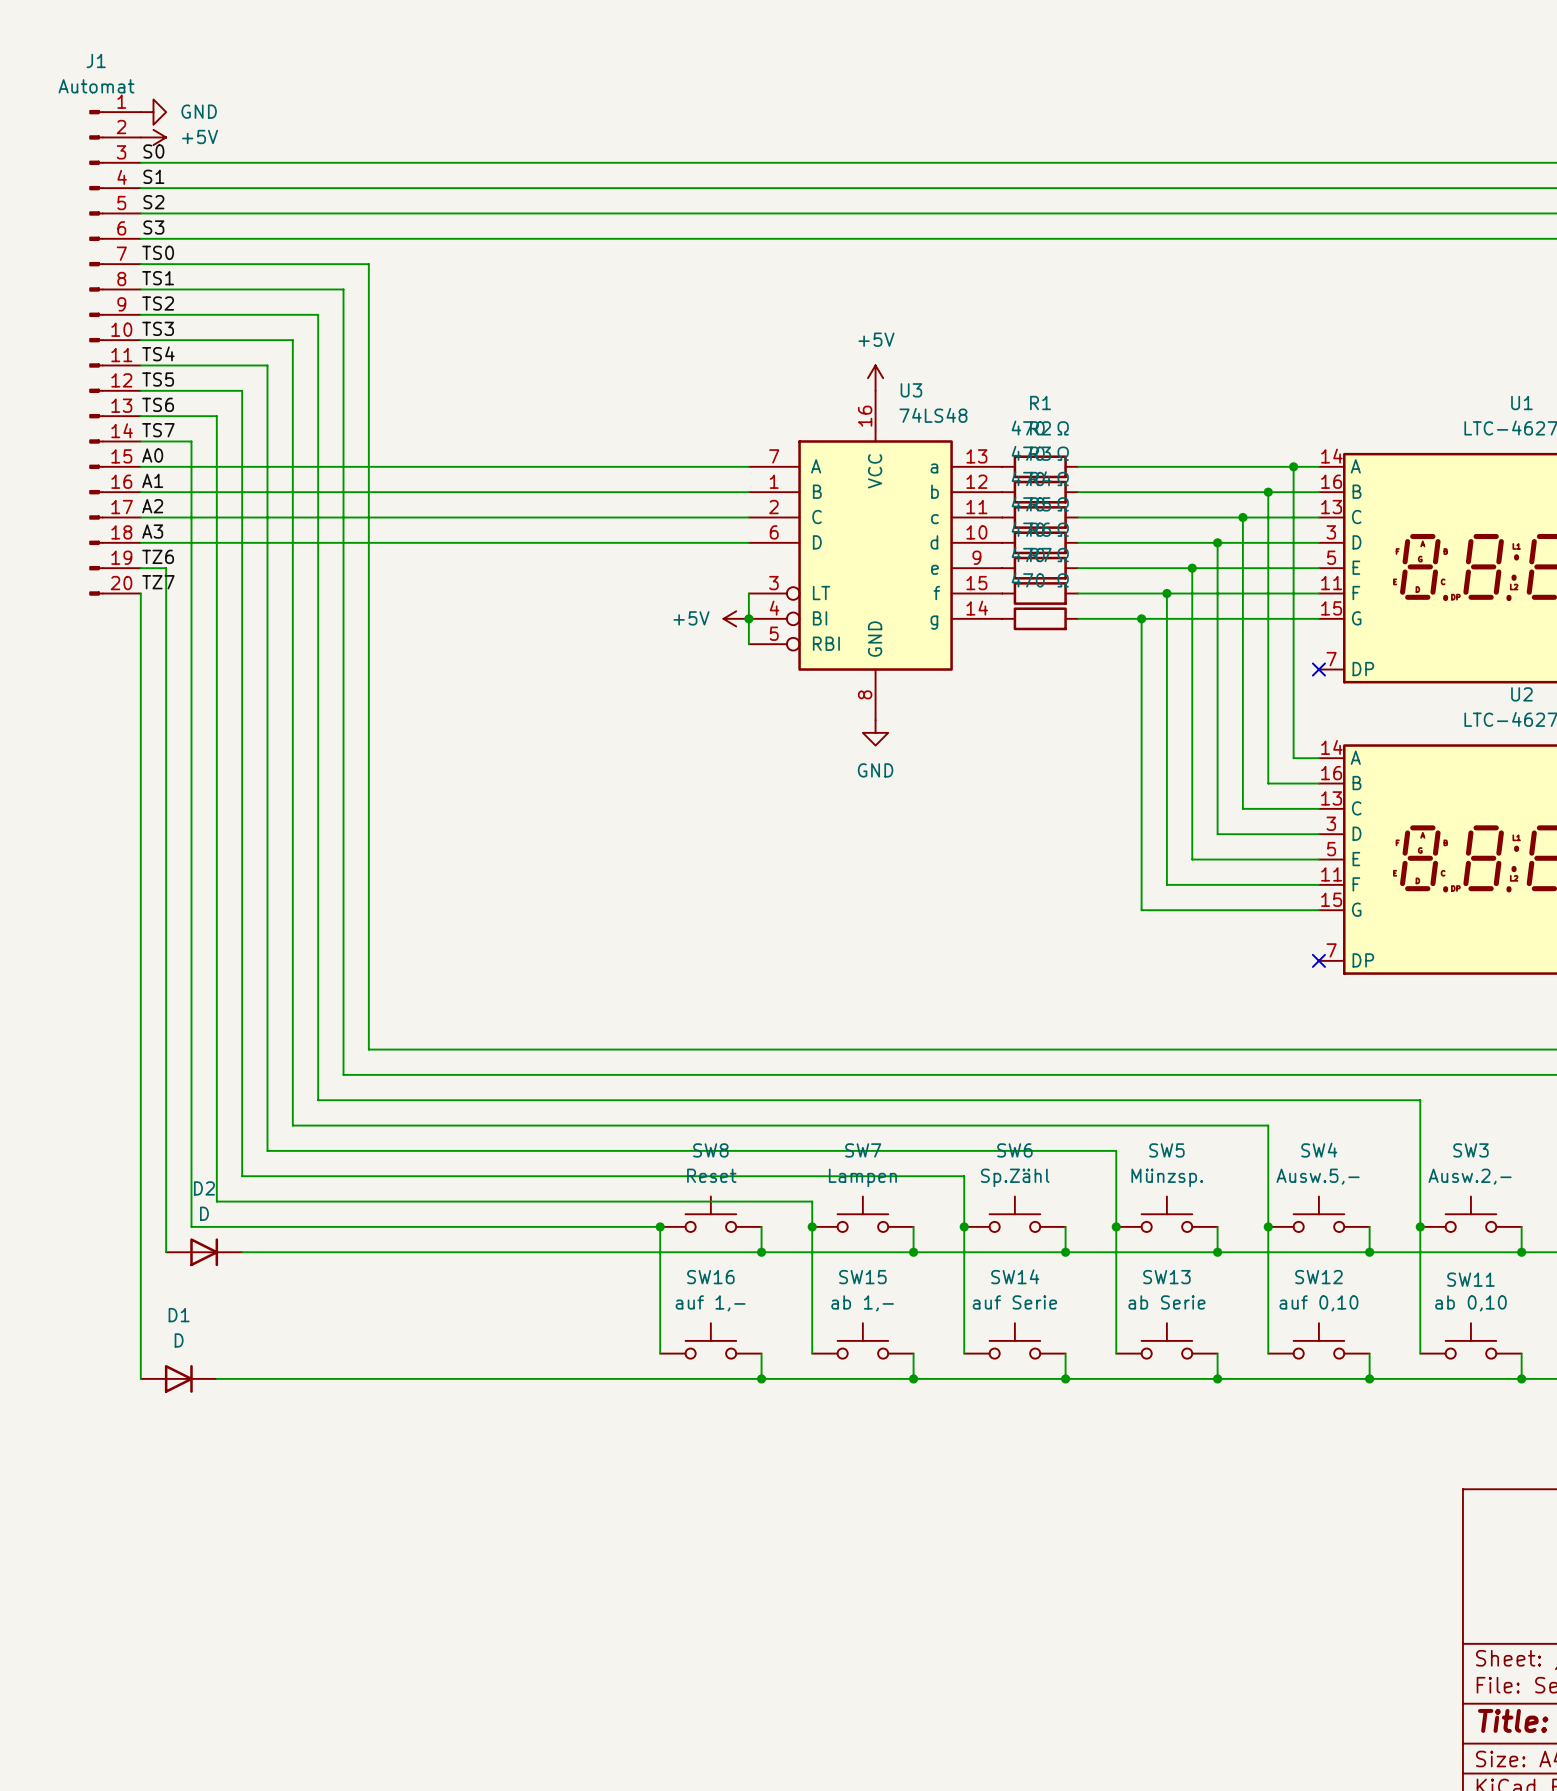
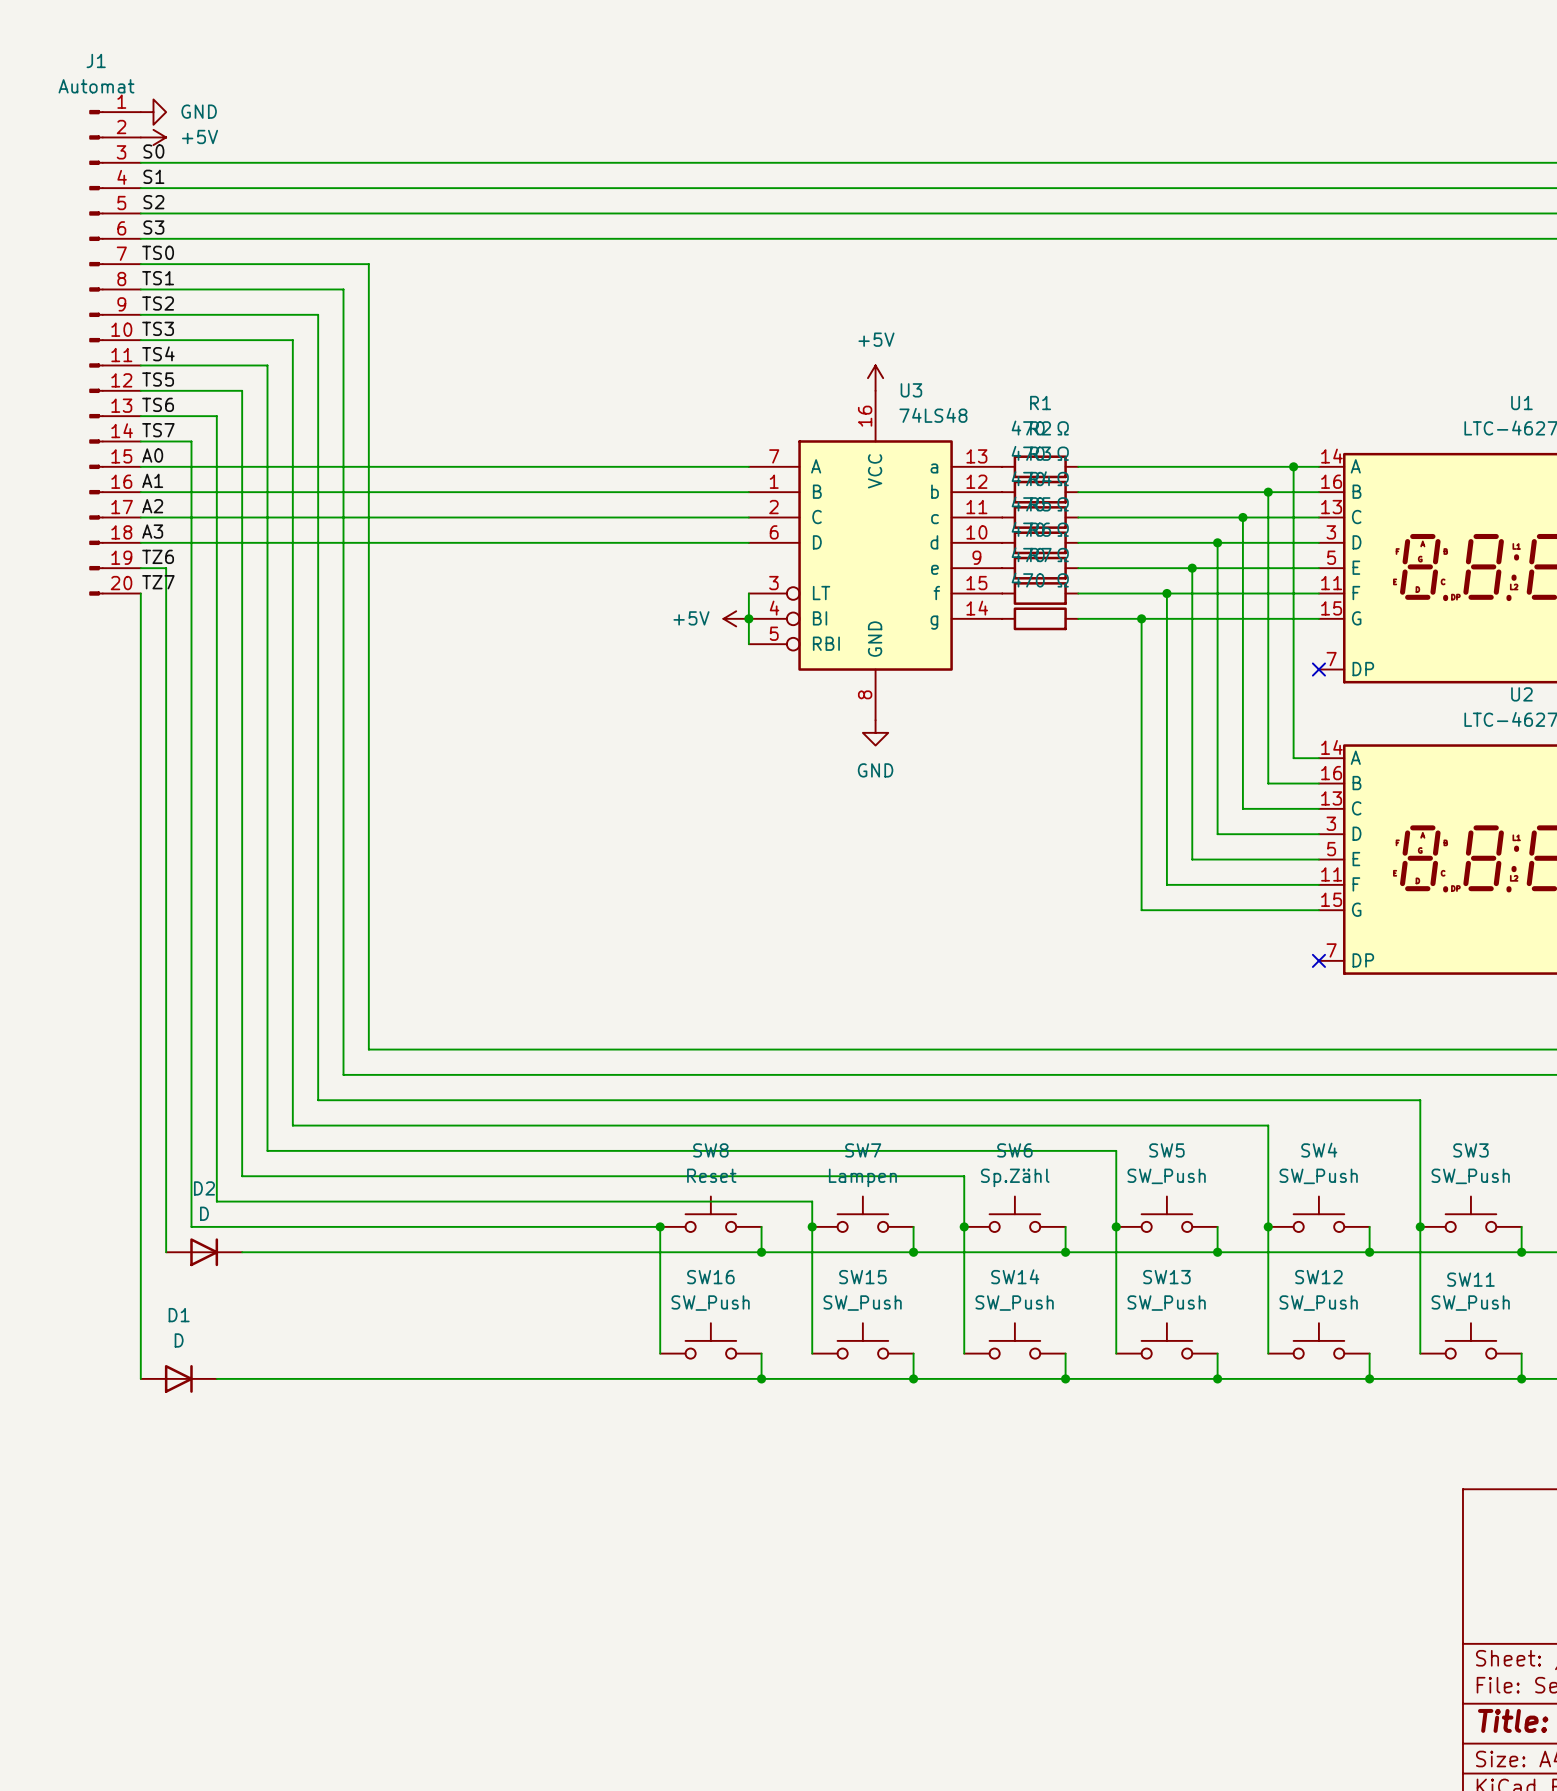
SW4 value: Ausw.5,- (1318, 1176) -> SW_Push (1318, 1176)
SW3 value: Ausw.2,- (1470, 1176) -> SW_Push (1470, 1176)
SW5 value: Münzsp. (1167, 1177) -> SW_Push (1166, 1176)
SW14 value: auf Serie (1014, 1302) -> SW_Push (1014, 1303)
SW13 value: ab Serie (1166, 1302) -> SW_Push (1166, 1303)
SW16 value: auf 1,- (710, 1303) -> SW_Push (710, 1303)
SW15 value: ab 1,- (862, 1303) -> SW_Push (862, 1303)
SW12 value: auf 0,10 (1318, 1303) -> SW_Push (1318, 1303)
SW11 value: ab 0,10 (1470, 1303) -> SW_Push (1470, 1303)

